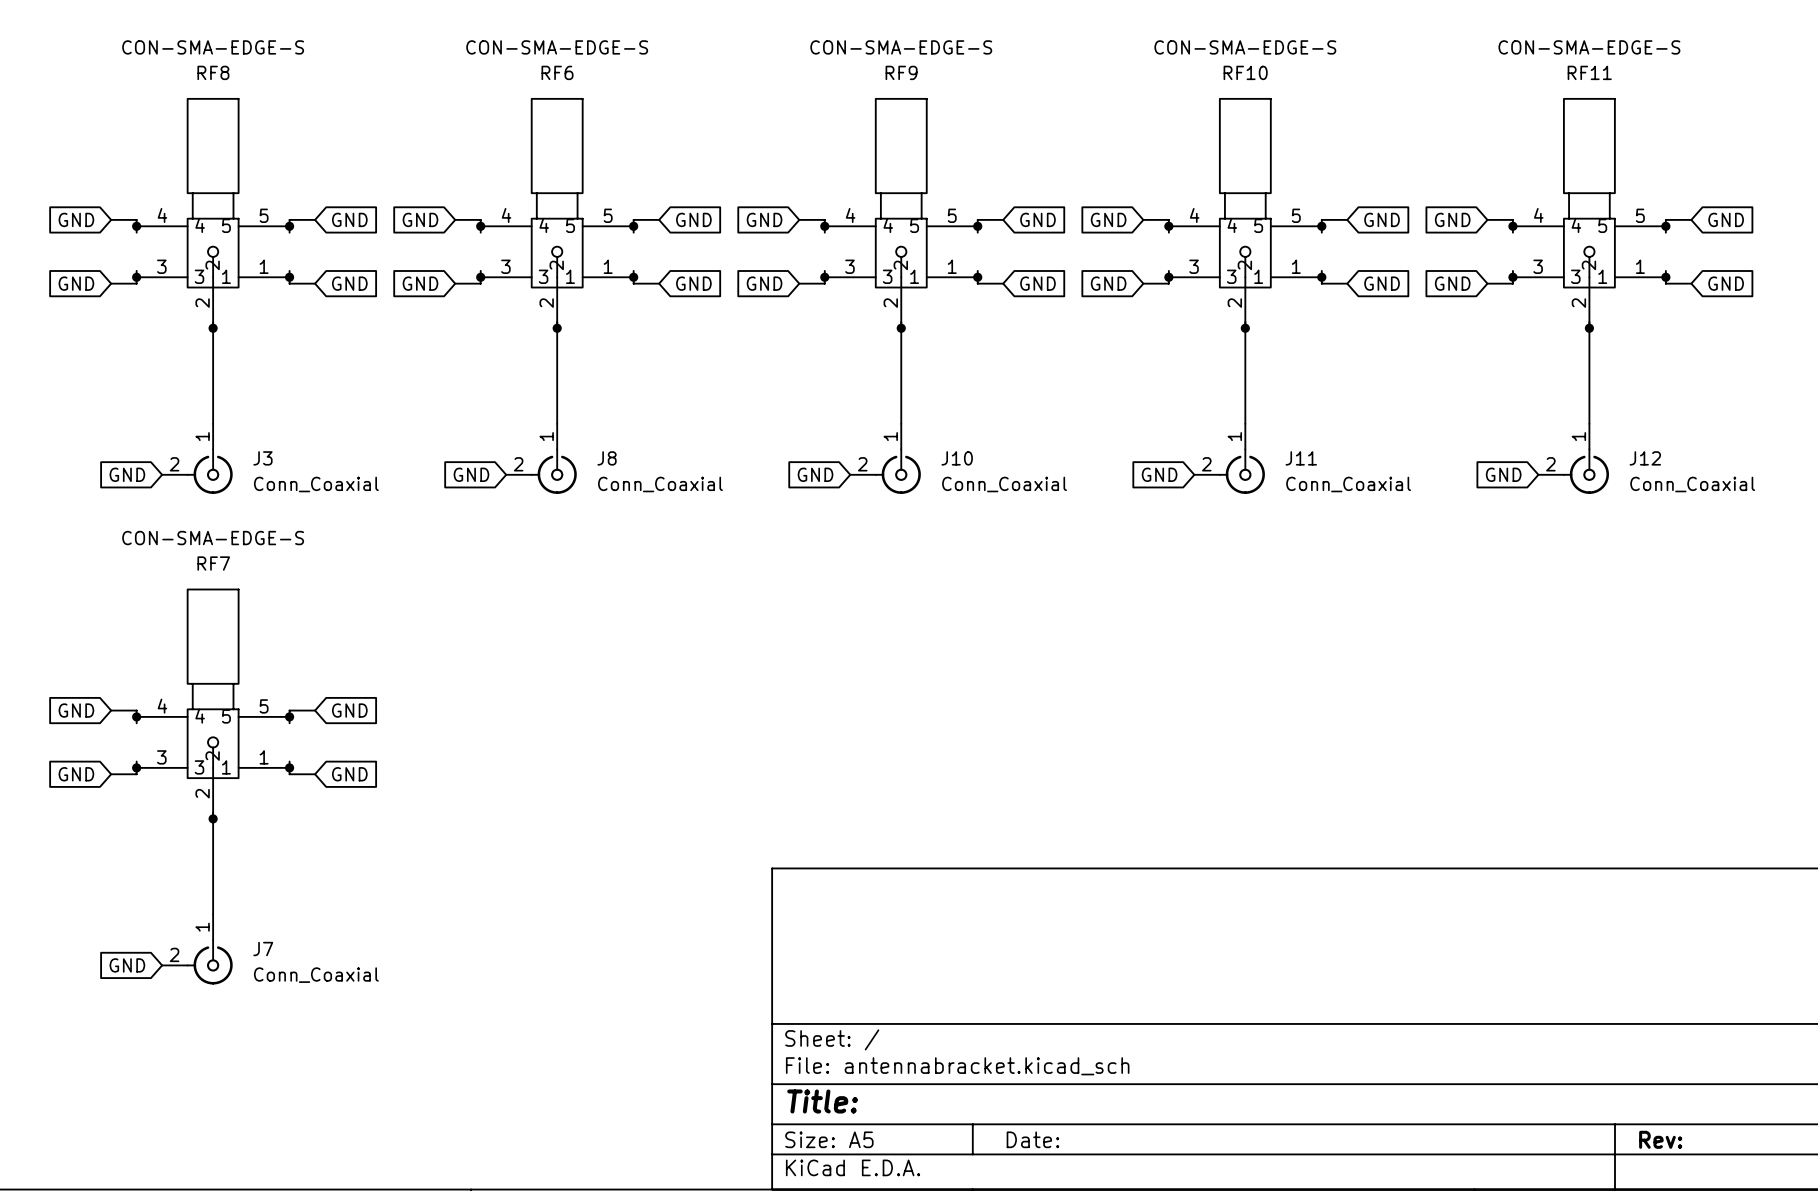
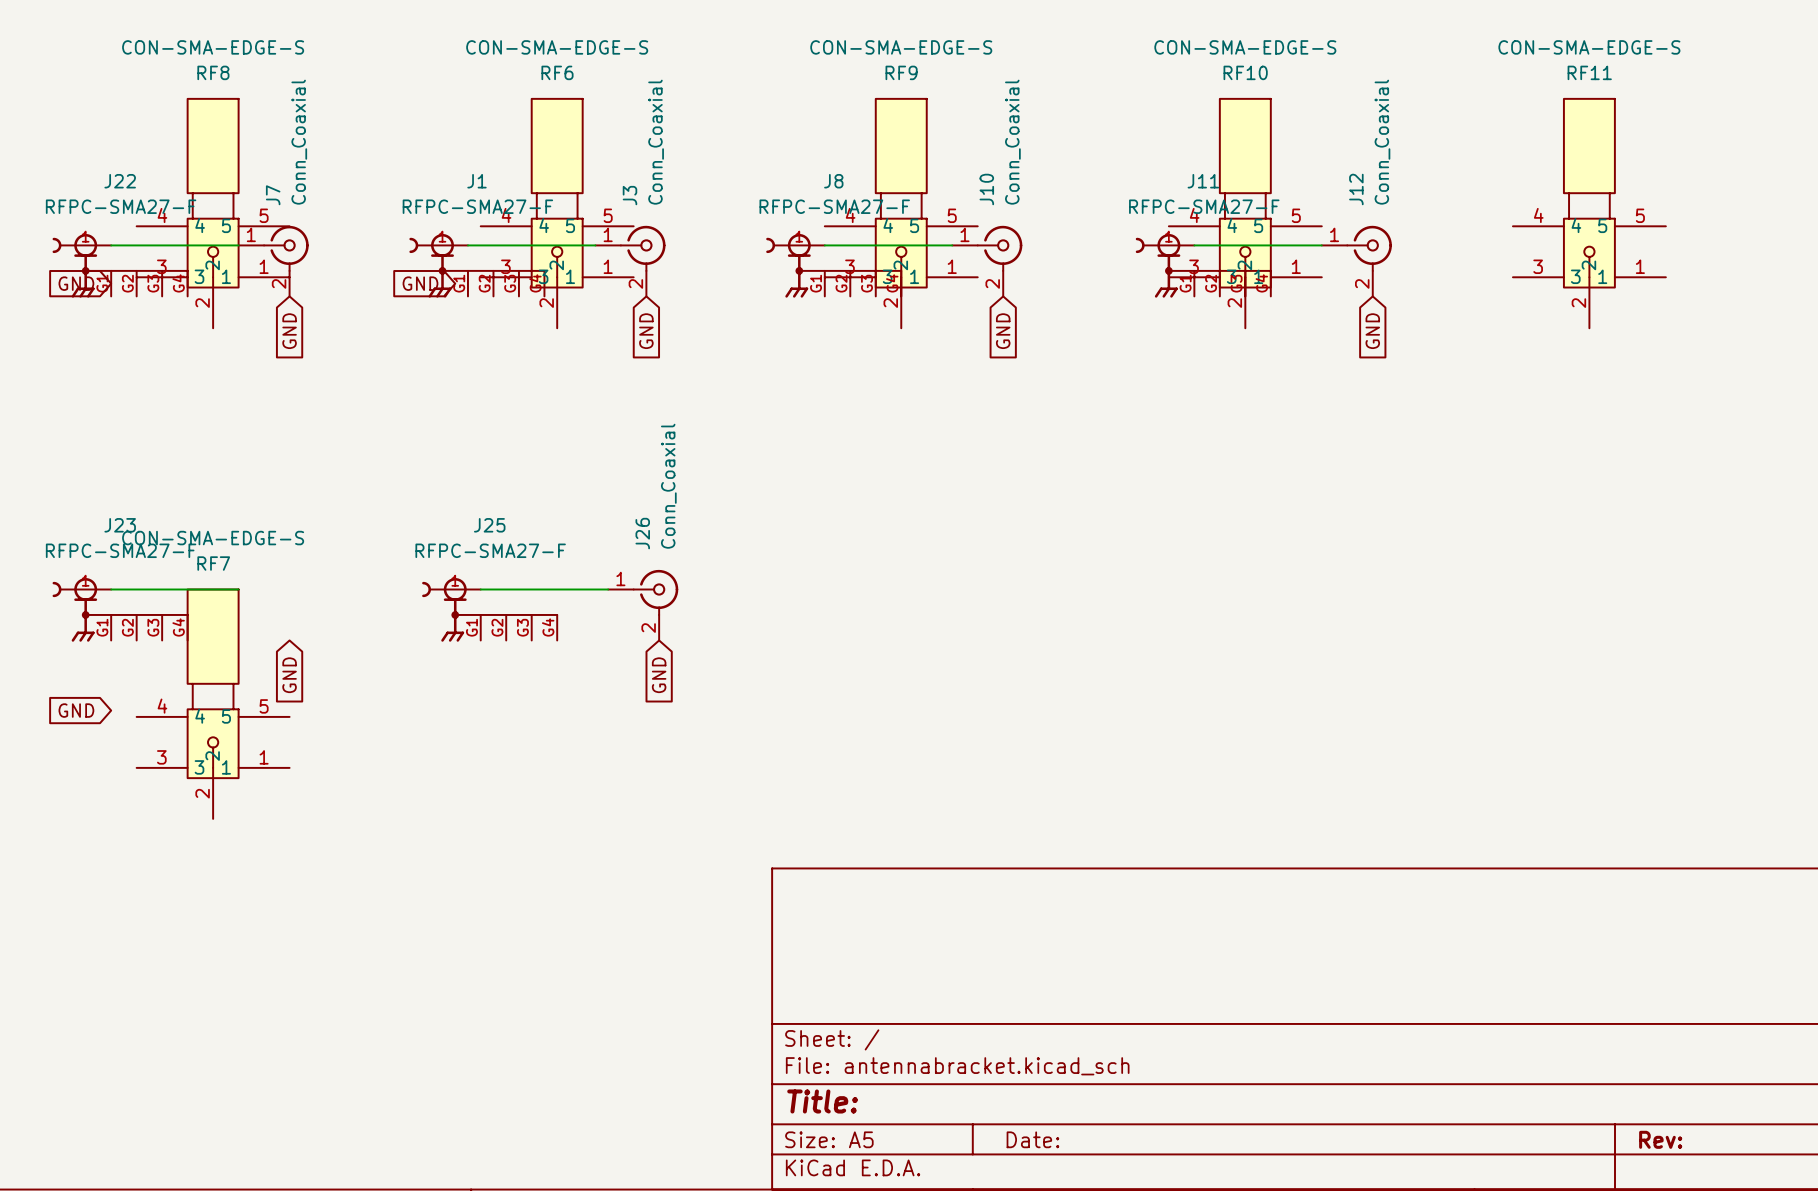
global label: GND (76, 219) -> none
wire: (111, 219) (136, 219) (136, 232) -> none
wire: (315, 219) (289, 219) (289, 232) -> none
global label: GND (349, 219) -> none
global label: GND (420, 219) -> none
wire: (455, 219) (480, 219) (480, 232) -> none
wire: (659, 219) (633, 219) (633, 232) -> none
global label: GND (693, 219) -> none
global label: GND (764, 219) -> none
wire: (799, 219) (824, 219) (824, 232) -> none
wire: (1003, 219) (977, 219) (977, 232) -> none
global label: GND (1037, 219) -> none
global label: GND (1108, 219) -> none
wire: (1143, 219) (1168, 219) (1168, 232) -> none
wire: (1347, 219) (1321, 219) (1321, 232) -> none
global label: GND (1382, 219) -> none
global label: GND (1452, 219) -> none
wire: (1487, 219) (1512, 219) (1512, 232) -> none
wire: (1691, 219) (1665, 219) (1665, 232) -> none
global label: GND (1726, 219) -> none
junction: (136, 226) -> none
junction: (289, 226) -> none
junction: (480, 226) -> none
junction: (633, 226) -> none
junction: (824, 226) -> none
junction: (977, 226) -> none
junction: (1168, 226) -> none
junction: (1321, 226) -> none
junction: (1512, 226) -> none
junction: (1665, 226) -> none
wire: none -> (111, 245) (238, 245)
wire: none -> (467, 245) (595, 245)
wire: none -> (824, 245) (952, 245)
wire: none -> (1194, 245) (1321, 245)
J22: none -> RFPC-SMA27-F (120, 265)
J1: none -> RFPC-SMA27-F (477, 265)
wire: (136, 270) (136, 283) (111, 283) -> none
wire: (289, 270) (289, 283) (315, 283) -> none
wire: (480, 270) (480, 283) (455, 283) -> none
wire: (633, 270) (633, 283) (659, 283) -> none
wire: (824, 270) (824, 283) (799, 283) -> none
wire: (977, 270) (977, 283) (1003, 283) -> none
wire: (1168, 270) (1168, 283) (1143, 283) -> none
wire: (1321, 270) (1321, 283) (1347, 283) -> none
wire: (1512, 270) (1512, 283) (1487, 283) -> none
wire: (1665, 270) (1665, 283) (1691, 283) -> none
junction: (136, 277) -> none
junction: (289, 277) -> none
junction: (480, 277) -> none
junction: (633, 277) -> none
junction: (824, 277) -> none
junction: (977, 277) -> none
junction: (1168, 277) -> none
junction: (1321, 277) -> none
junction: (1512, 277) -> none
junction: (1665, 277) -> none
global label rotation: 0° (349, 283) -> 90° clockwise (289, 331)
global label position: GND (349, 283) -> GND (289, 331)
global label rotation: 0° (693, 283) -> 90° clockwise (646, 331)
global label: GND (764, 283) -> none
global label rotation: 0° (1037, 283) -> 90° clockwise (1003, 331)
global label: GND (1108, 283) -> none
global label rotation: 0° (1382, 283) -> 90° clockwise (1372, 331)
global label: GND (1452, 283) -> none
global label: GND (1726, 283) -> none
wire: (213, 321) (213, 423) -> none
wire: (557, 321) (557, 423) -> none
wire: (901, 321) (901, 423) -> none
wire: (1245, 321) (1245, 423) -> none
wire: (1589, 321) (1589, 423) -> none
junction: (213, 328) -> none
junction: (557, 328) -> none
junction: (901, 328) -> none
junction: (1245, 328) -> none
junction: (1589, 328) -> none
J8 symbol: [506, 423, 577, 494] -> [766, 233, 903, 298]
J11 symbol: [1194, 423, 1265, 494] -> [1135, 233, 1272, 298]
J3 position: (197, 458) -> (630, 261)
J8 name position: J8 (607, 458) -> J8 (833, 181)
J10 position: (885, 458) -> (987, 261)
J11 name position: J11 (1301, 458) -> J11 (1203, 181)
J12 position: (1573, 458) -> (1356, 261)
J3 rotation: 0° (210, 471) -> 90° counterclockwise (643, 248)
J10 rotation: 0° (898, 471) -> 90° counterclockwise (1000, 248)
J12 rotation: 0° (1586, 471) -> 90° counterclockwise (1369, 248)
global label: GND (127, 474) -> none
global label: GND (471, 474) -> none
global label: GND (815, 474) -> none
global label: GND (1159, 474) -> none
global label: GND (1503, 474) -> none
J8 value: Conn_Coaxial (660, 484) -> RFPC-SMA27-F (834, 206)
J11 value: Conn_Coaxial (1348, 484) -> RFPC-SMA27-F (1204, 206)
wire: none -> (111, 589) (238, 589)
wire: none -> (480, 589) (608, 589)
J26: none -> Conn_Coaxial (643, 605)
J23: none -> RFPC-SMA27-F (120, 609)
J25: none -> RFPC-SMA27-F (490, 609)
global label: none -> GND (289, 675)
global label: none -> GND (659, 675)
wire: (111, 710) (136, 710) (136, 723) -> none
wire: (315, 710) (289, 710) (289, 723) -> none
global label: GND (349, 710) -> none
junction: (136, 716) -> none
junction: (289, 716) -> none
wire: (136, 761) (136, 774) (111, 774) -> none
wire: (289, 761) (289, 774) (315, 774) -> none
junction: (136, 767) -> none
junction: (289, 767) -> none
global label: GND (76, 774) -> none
global label: GND (349, 774) -> none
wire: (213, 812) (213, 914) -> none
junction: (213, 818) -> none
J7 position: (197, 949) -> (273, 261)
J7 rotation: 0° (210, 962) -> 90° counterclockwise (286, 248)
global label: GND (127, 965) -> none

